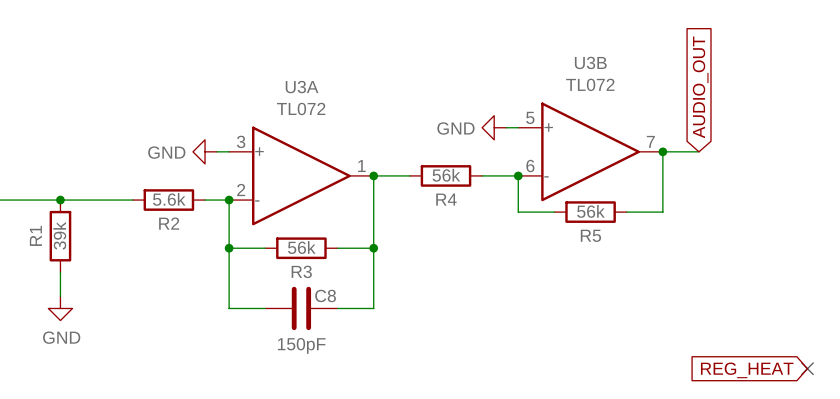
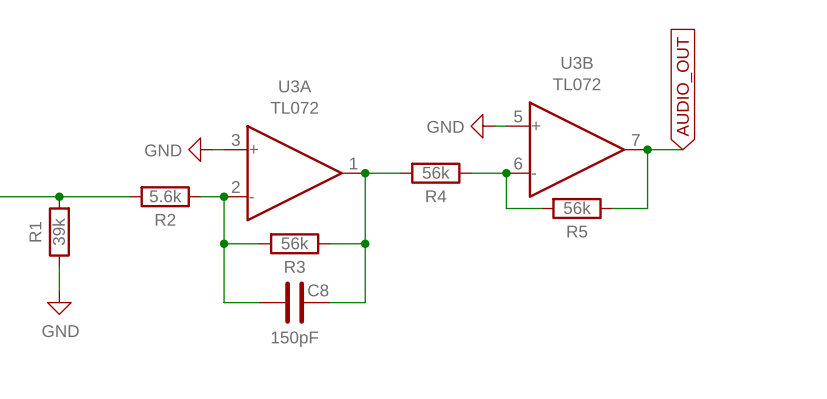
no-connect mark: (807, 368) -> none
global label: REG_HEAT (747, 370) -> none

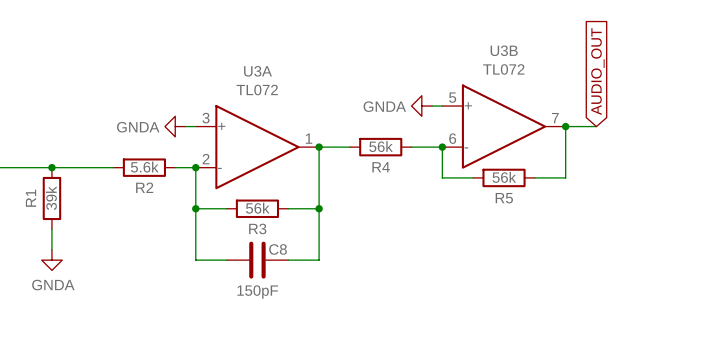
power symbol: GND (482, 126) -> GNDA (421, 106)
power symbol: GND (200, 149) -> GNDA (175, 126)
power symbol: GND (59, 302) -> GNDA (51, 260)

